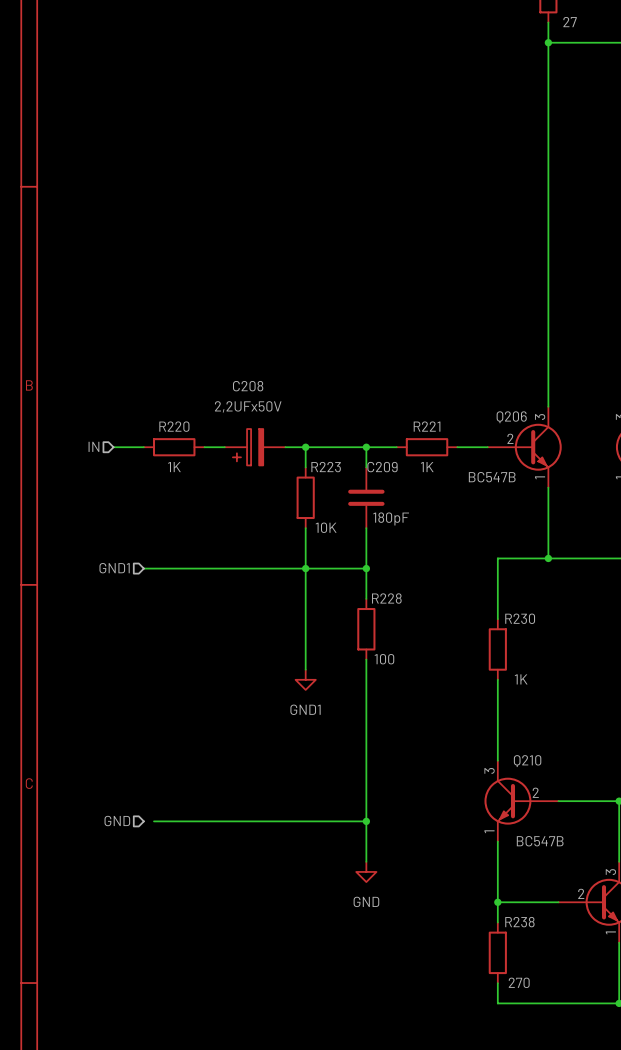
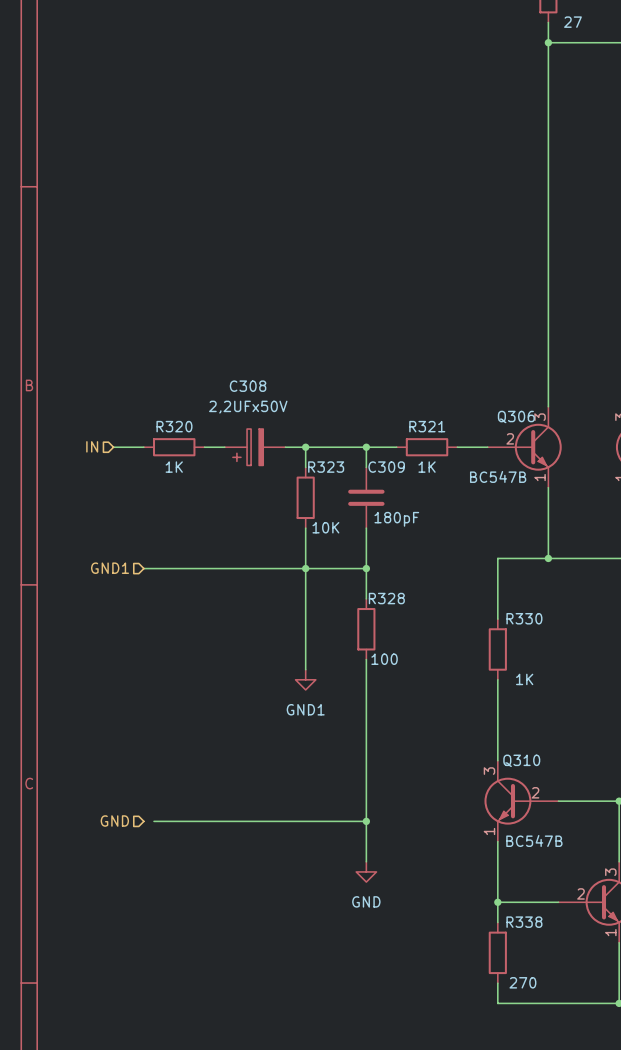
C208 name: C208 (248, 386) -> C308 (248, 386)
Q206 name: Q206 (511, 417) -> Q306 (516, 416)
R220 name: R220 (174, 426) -> R320 (174, 426)
R221 name: R221 (427, 426) -> R321 (427, 426)
R223 name: R223 (326, 467) -> R323 (326, 467)
C209 name: C209 (382, 467) -> C309 (386, 467)
R228 name: R228 (386, 598) -> R328 (386, 598)
R230 name: R230 (520, 618) -> R330 (524, 618)
Q210 name: Q210 (527, 761) -> Q310 (521, 760)
R238 name: R238 (519, 922) -> R338 (524, 922)

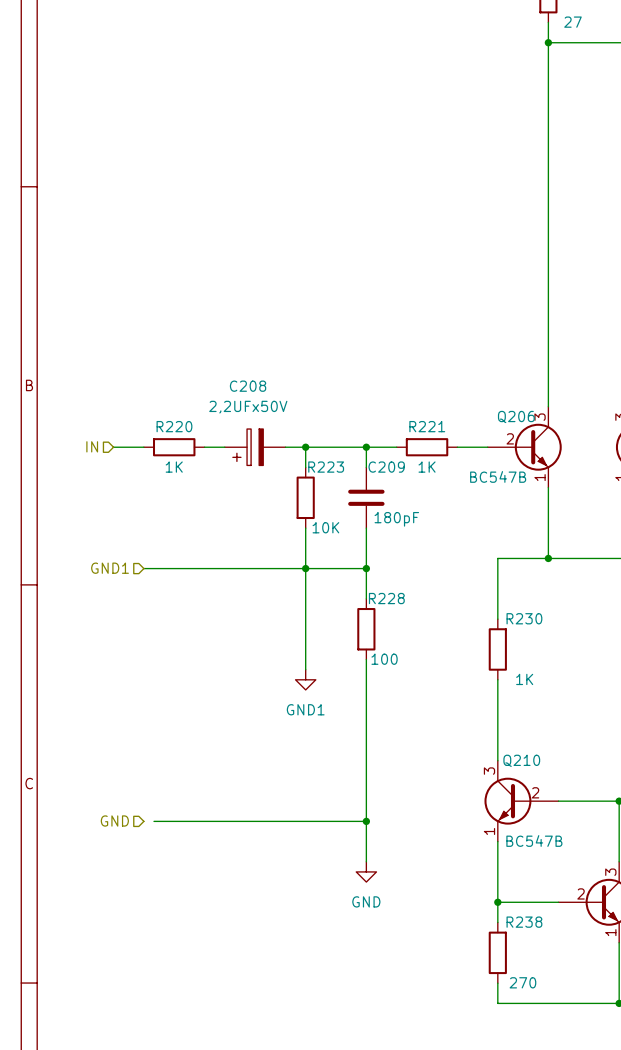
C308 name: C308 (248, 386) -> C208 (248, 386)
Q306 name: Q306 (516, 416) -> Q206 (516, 416)
R320 name: R320 (174, 426) -> R220 (174, 426)
R321 name: R321 (427, 426) -> R221 (427, 426)
R323 name: R323 (326, 467) -> R223 (326, 467)
C309 name: C309 (386, 467) -> C209 (386, 467)
R328 name: R328 (386, 598) -> R228 (386, 598)
R330 name: R330 (524, 618) -> R230 (524, 618)
Q310 name: Q310 (521, 760) -> Q210 (521, 760)
R338 name: R338 (524, 922) -> R238 (524, 922)

